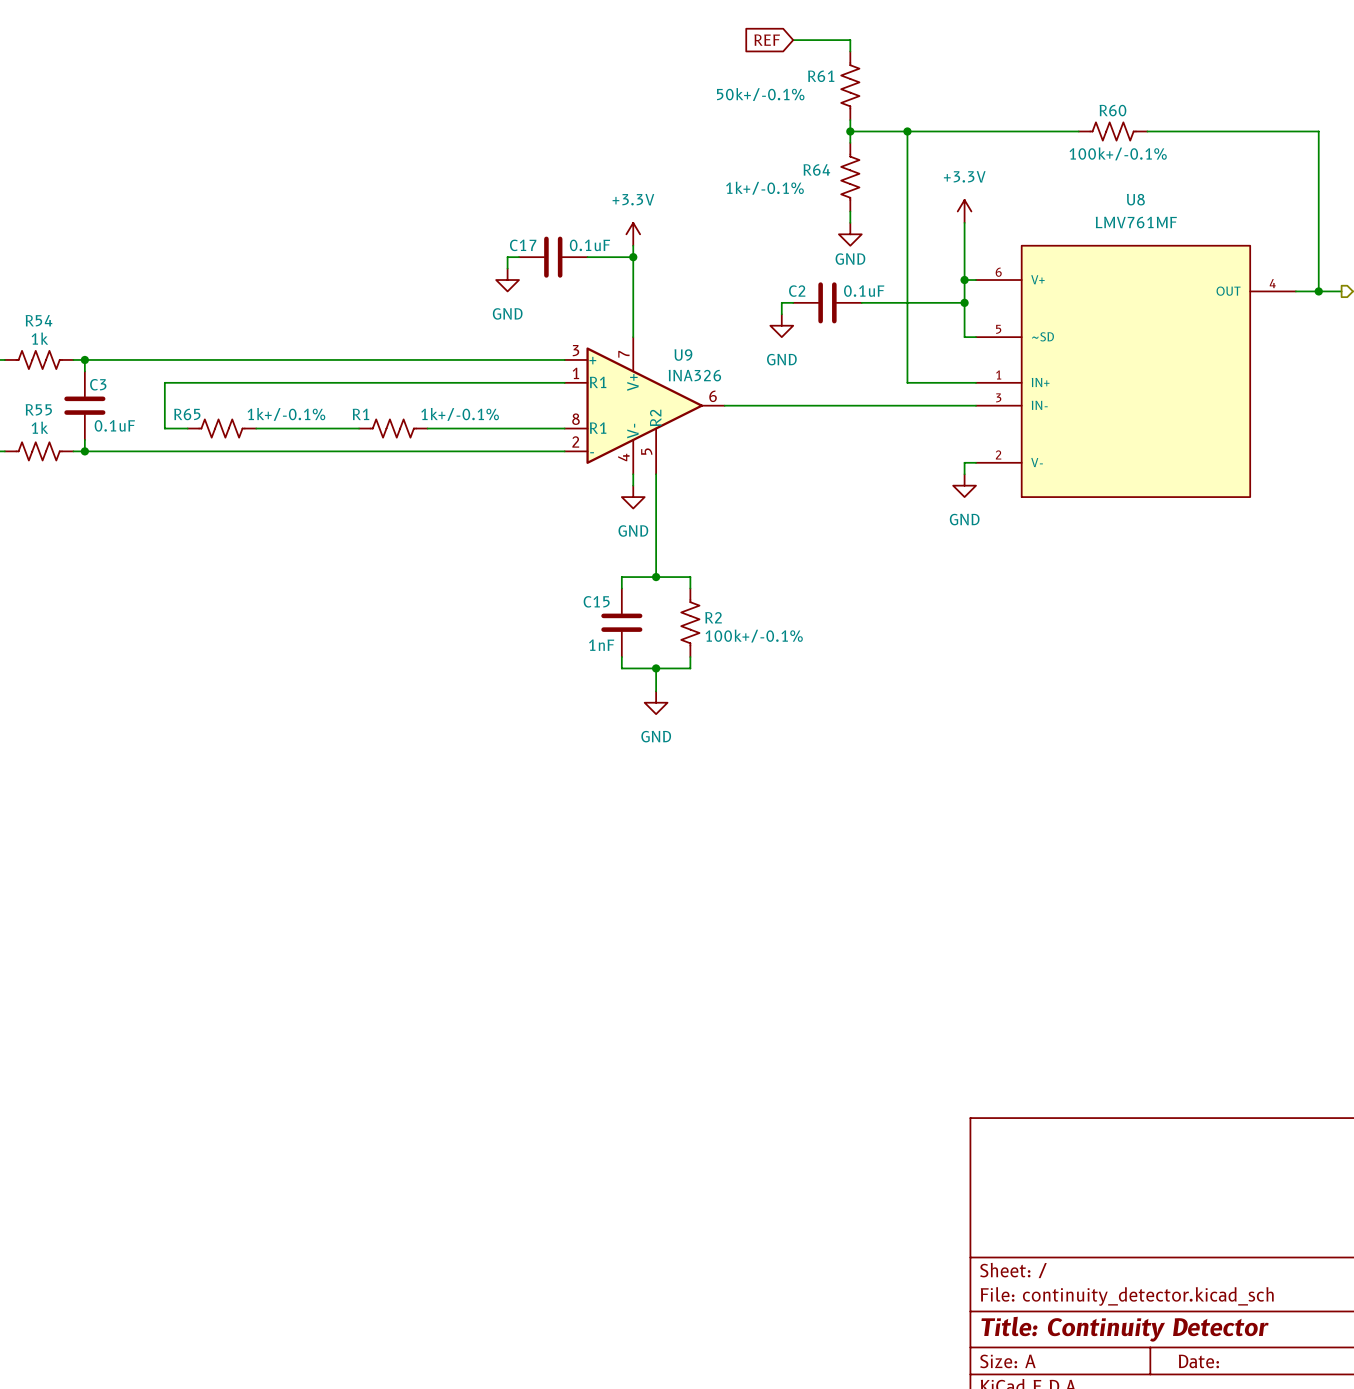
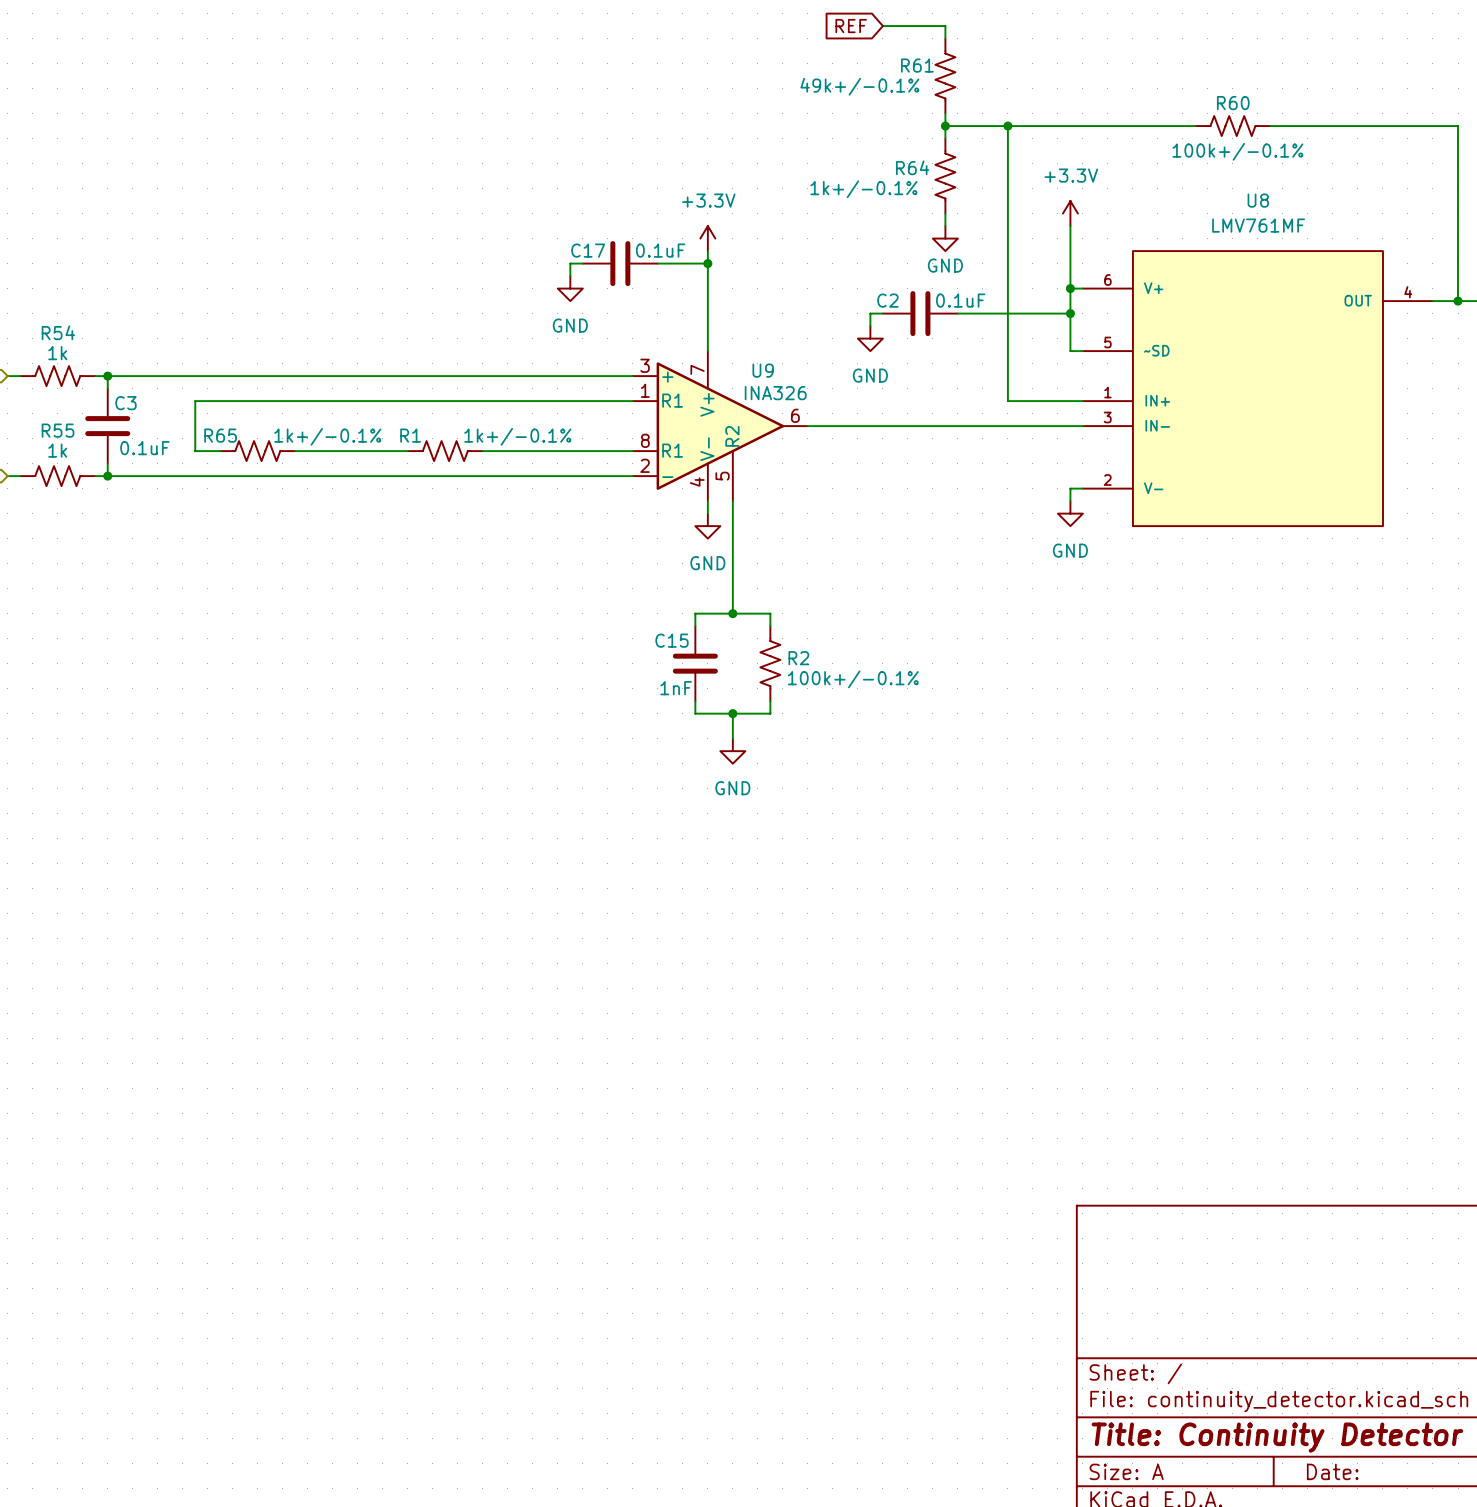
R61 value: 50k+/-0.1% (760, 94) -> 49k+/-0.1% (859, 86)

